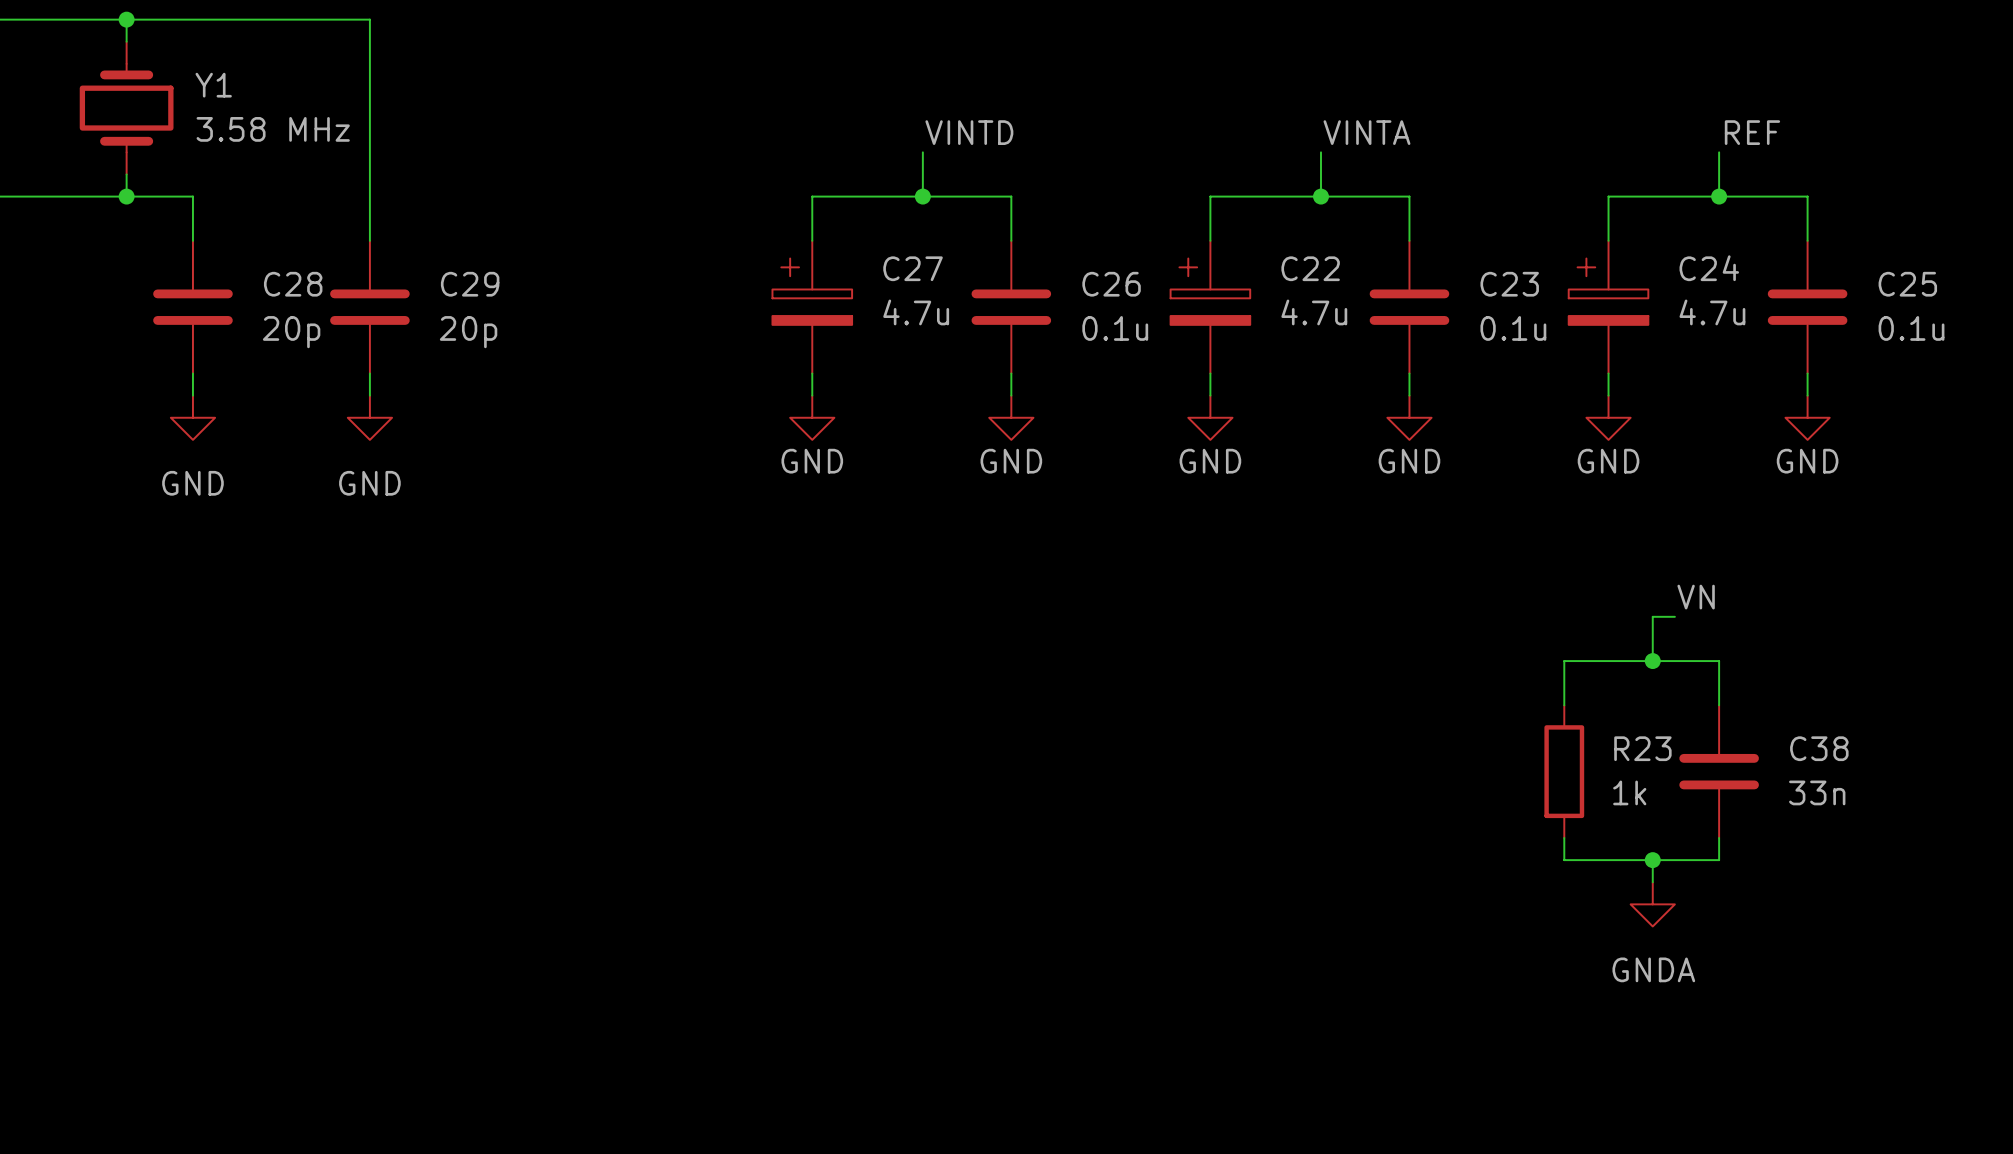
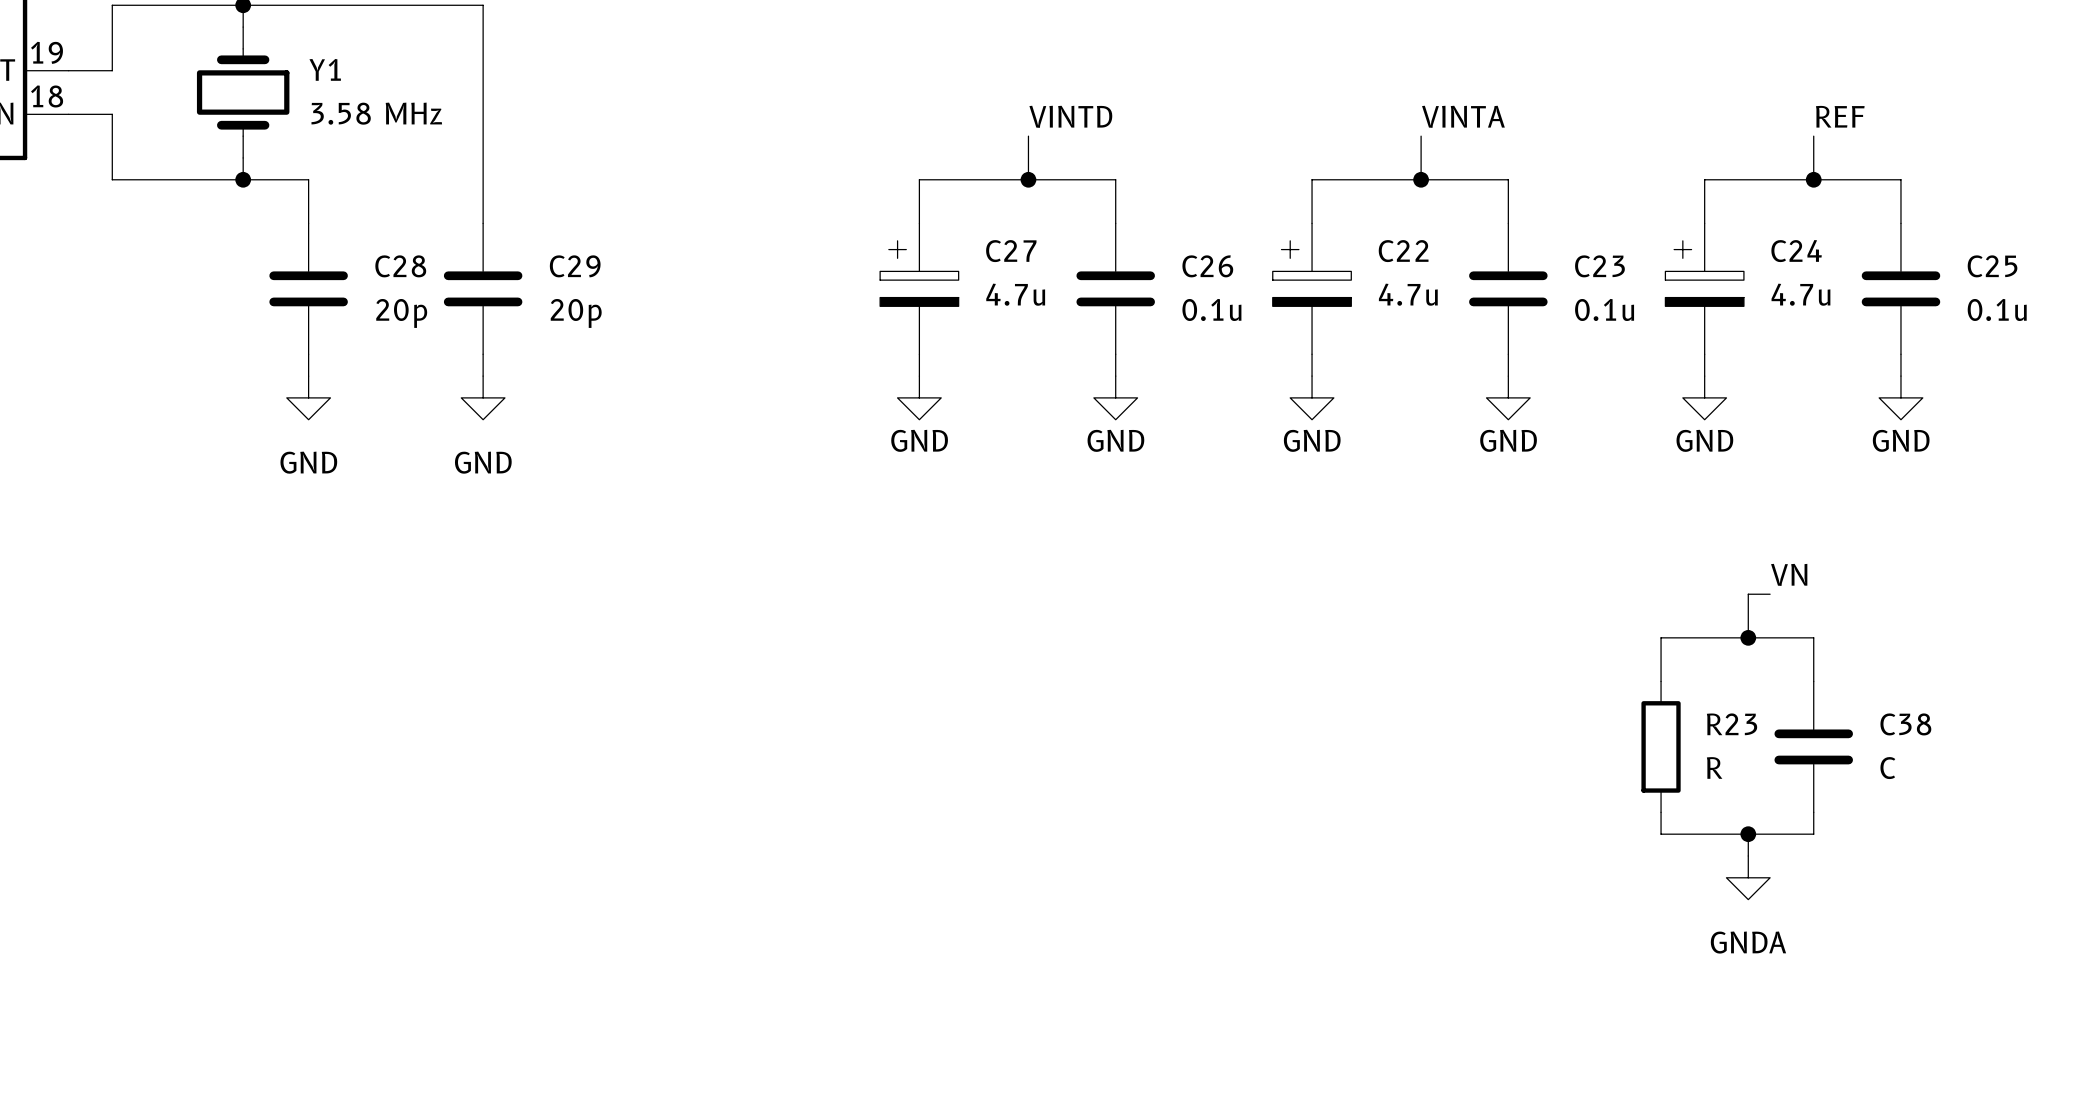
R23 value: 1k (1629, 792) -> R (1714, 767)
C38 value: 33n (1817, 792) -> C (1887, 768)

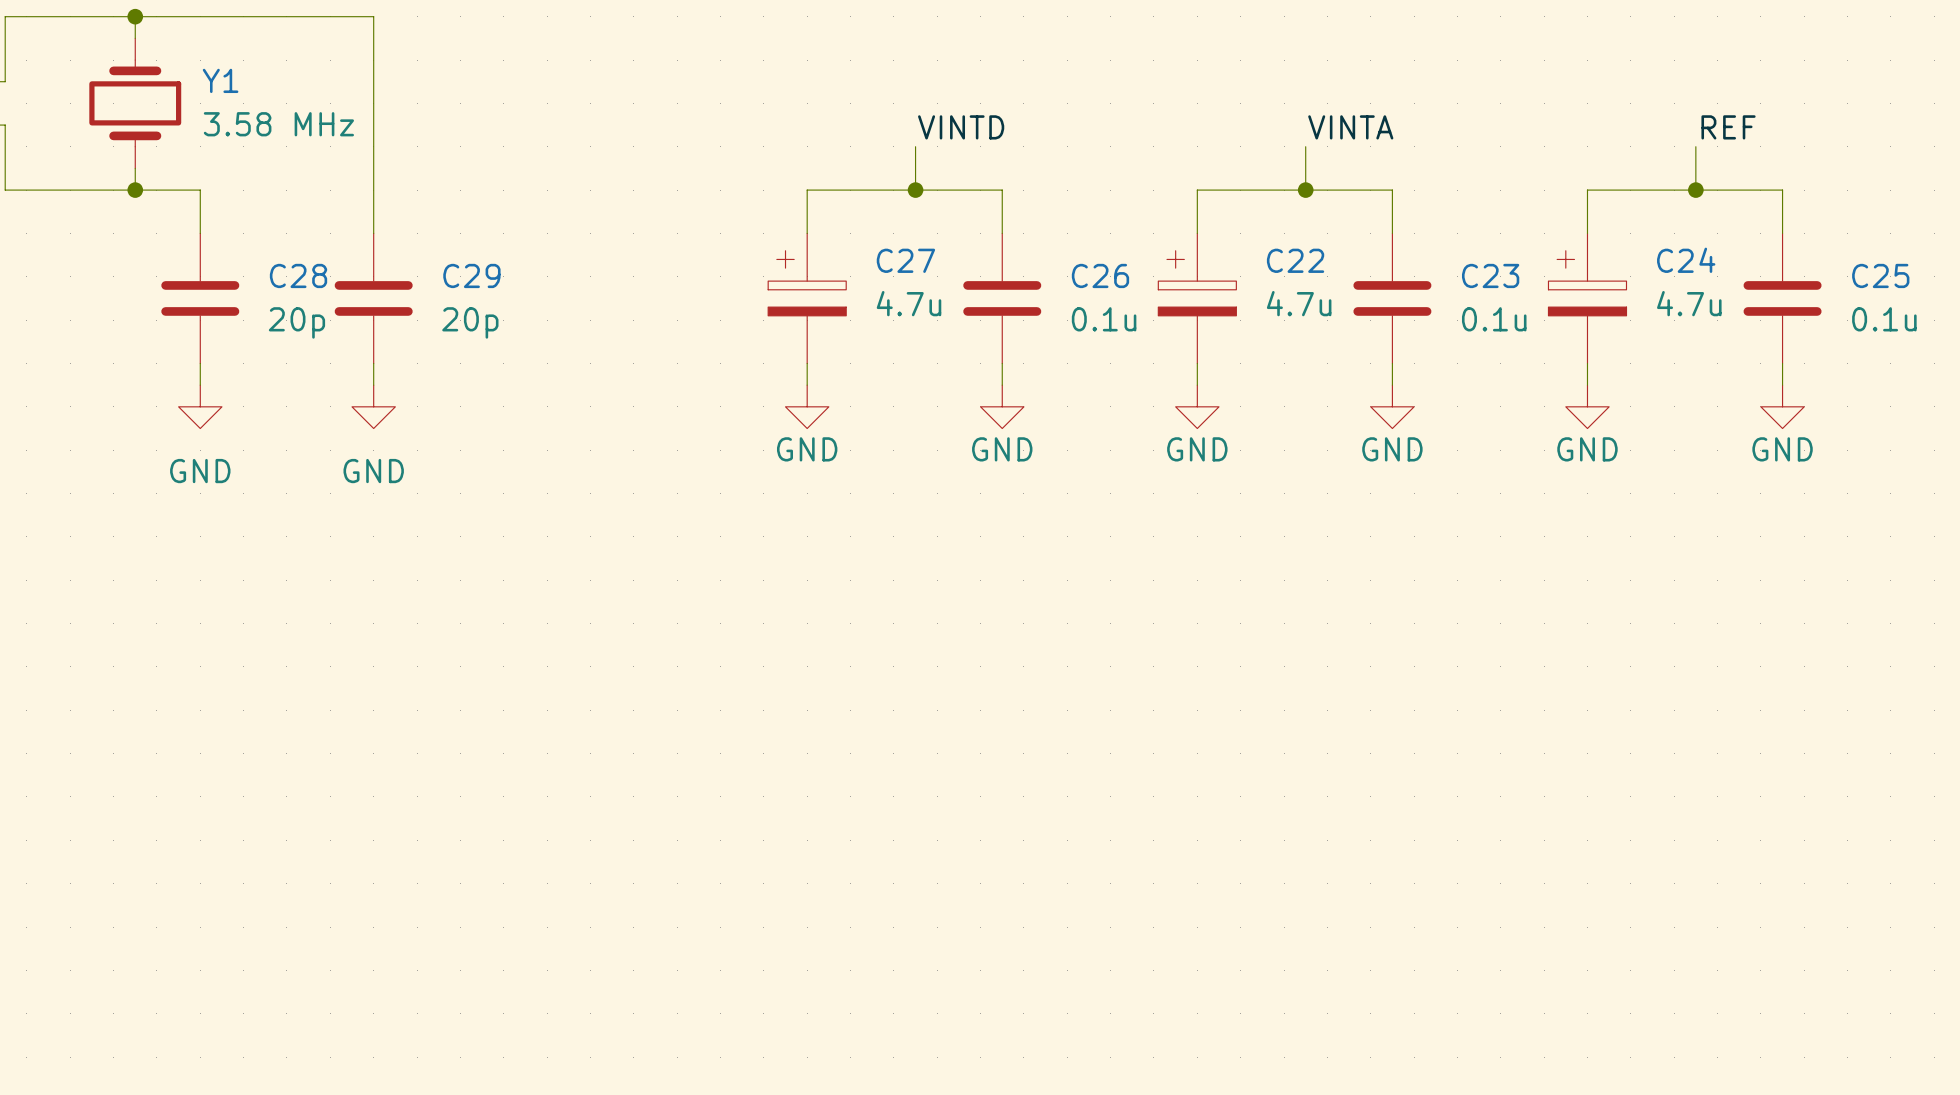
label: VN (1789, 574) -> none
wire: (1770, 594) (1748, 594) (1748, 637) -> none
junction: (1748, 637) -> none
wire: (1661, 681) (1661, 637) (1813, 637) (1813, 681) -> none
R23: R (1661, 746) -> none
C38: C (1813, 746) -> none
wire: (1661, 812) (1661, 834) (1813, 834) (1813, 812) -> none
wire: (1748, 834) (1748, 855) -> none
junction: (1748, 834) -> none
power symbol: GNDA (1748, 877) -> none

